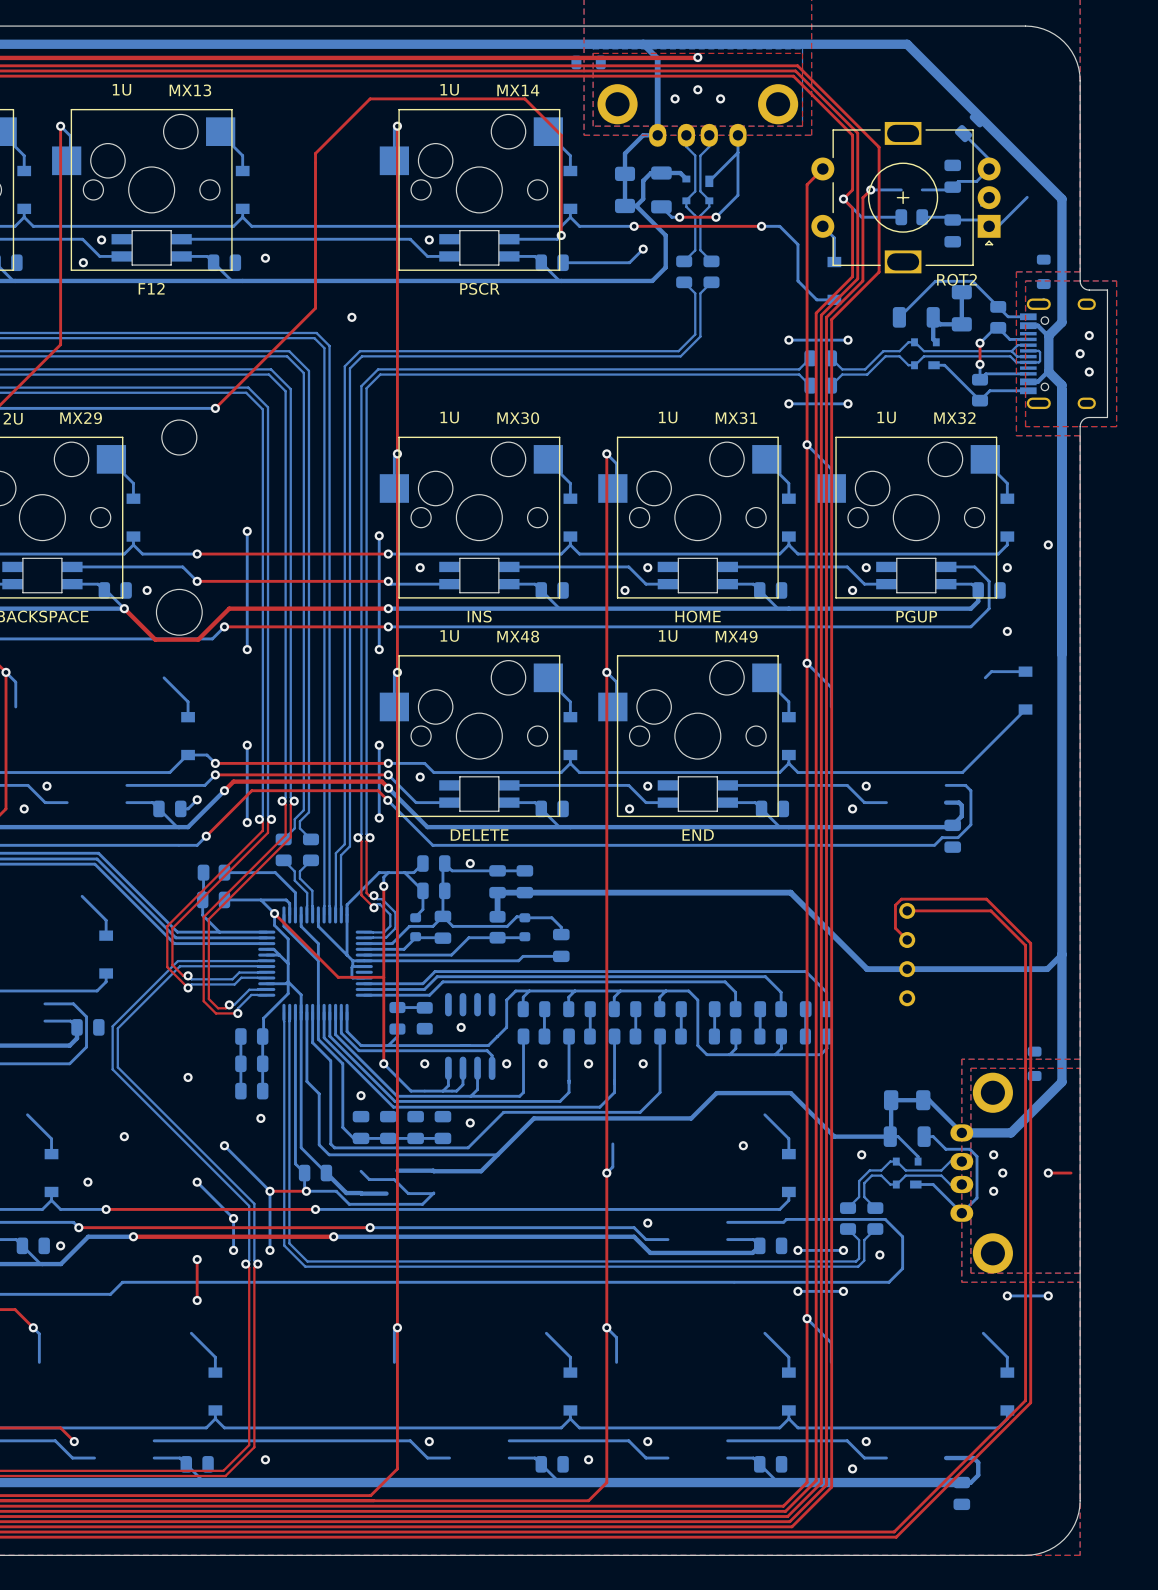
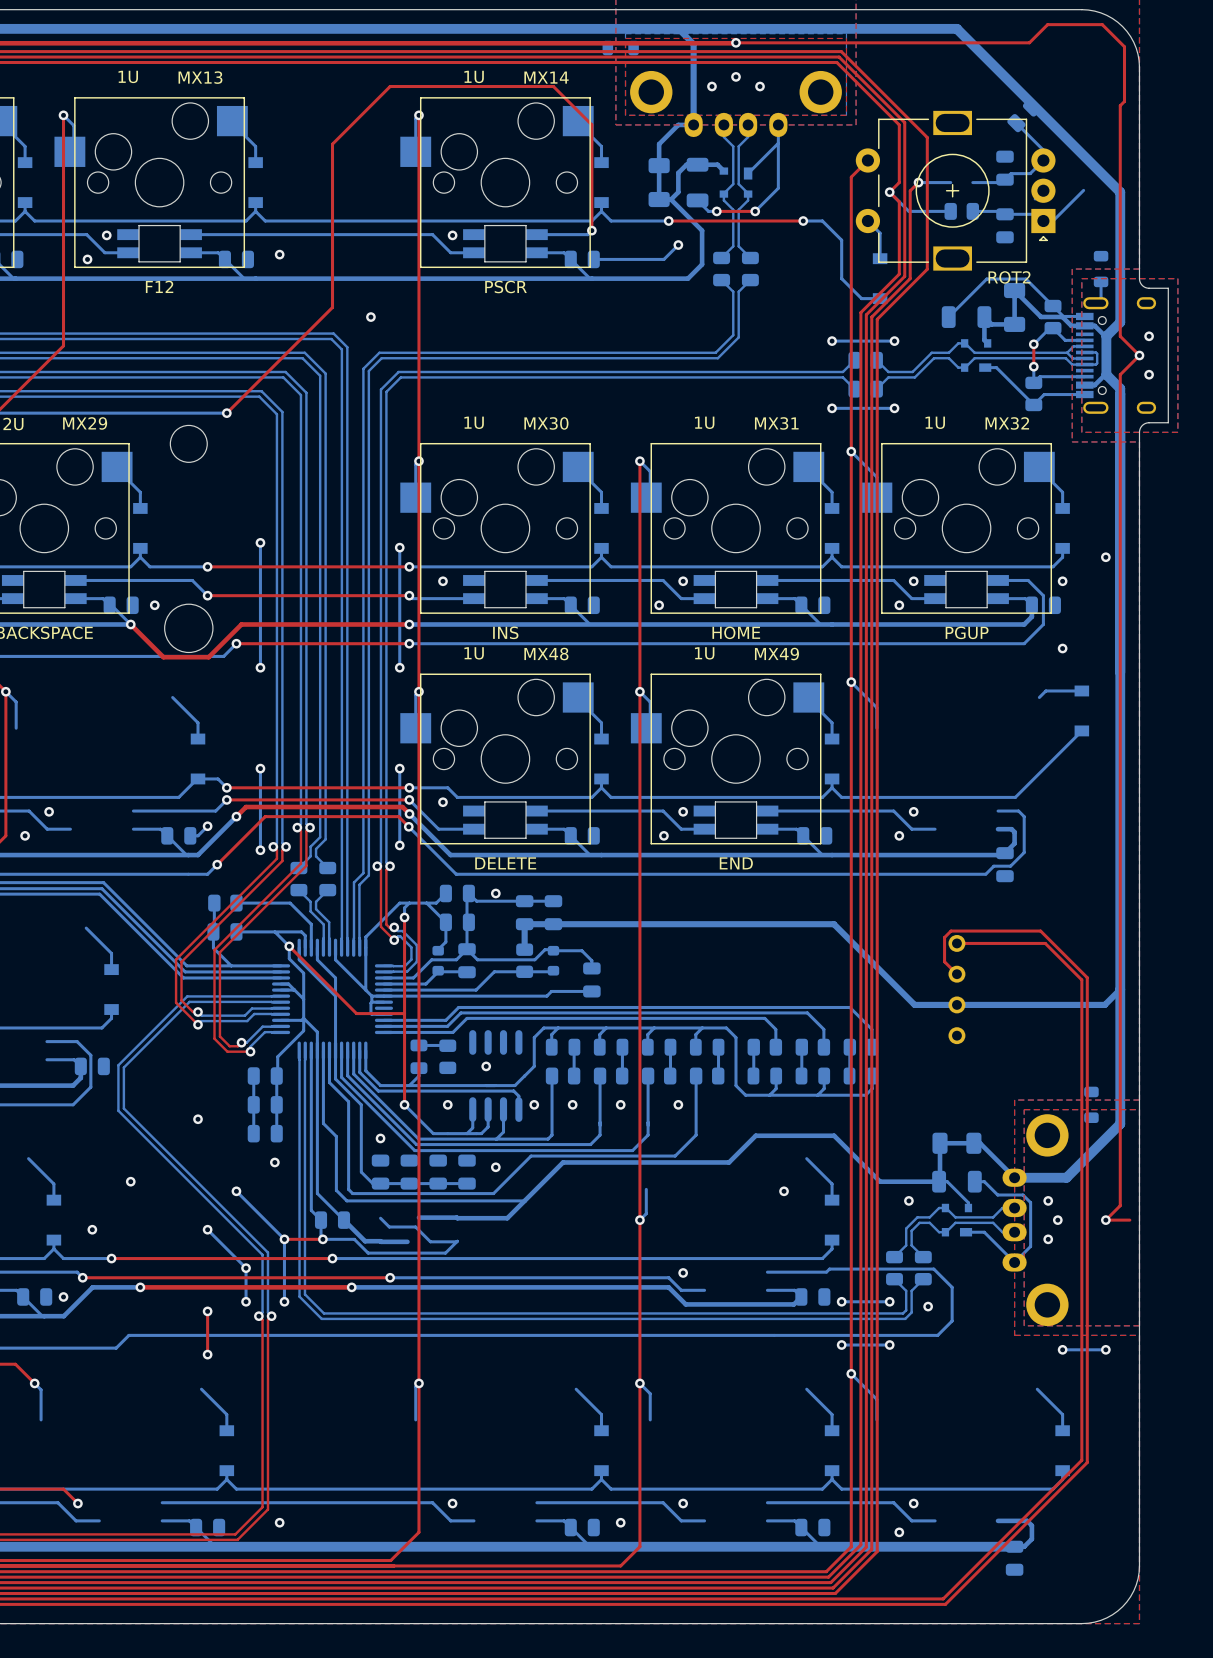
top track: none -> (735, 42) (1029, 42) (1047, 24) (1102, 24) (1124, 46) (1124, 101) (1120, 105) (1120, 336) (1139, 355) (1120, 374) (1120, 1205) (1105, 1220)
bottom track: none -> (1101, 281) (1101, 298)
bottom track: none -> (1014, 290) (1041, 316) (1062, 316) (1071, 325) (1084, 325)

